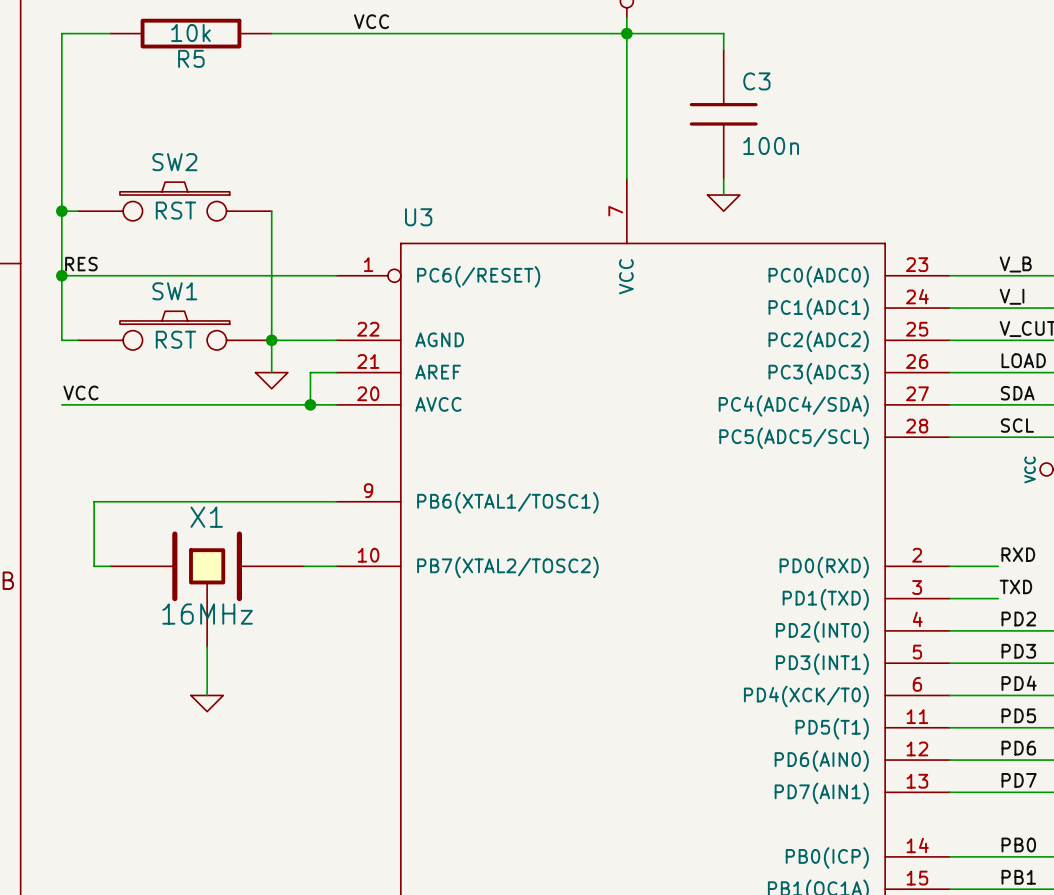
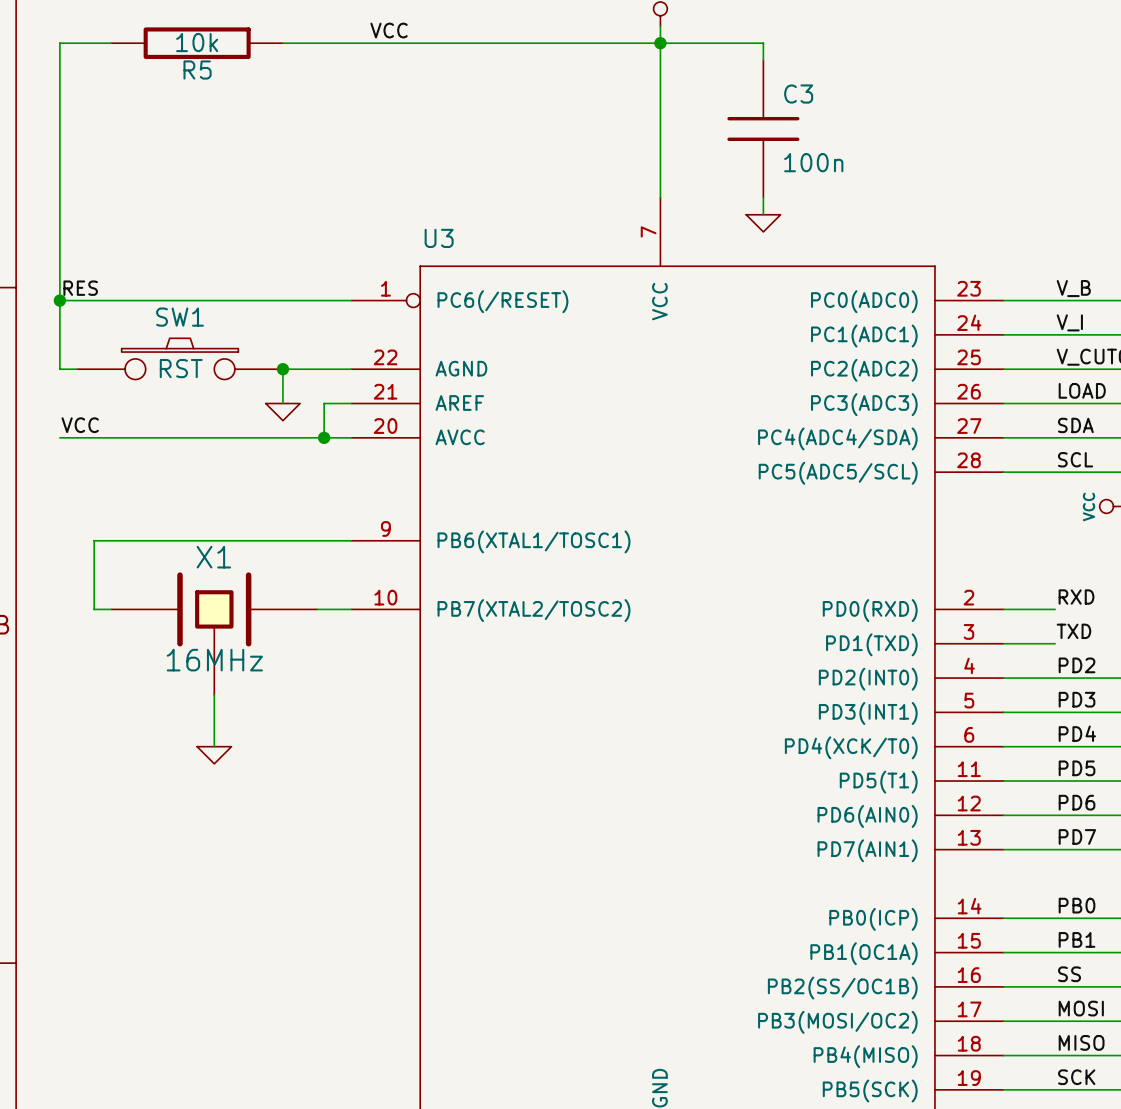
SW2: RST (174, 201) -> none
wire: (61, 211) (77, 211) -> none
junction: (61, 211) -> none
wire: (271, 211) (271, 340) -> none

